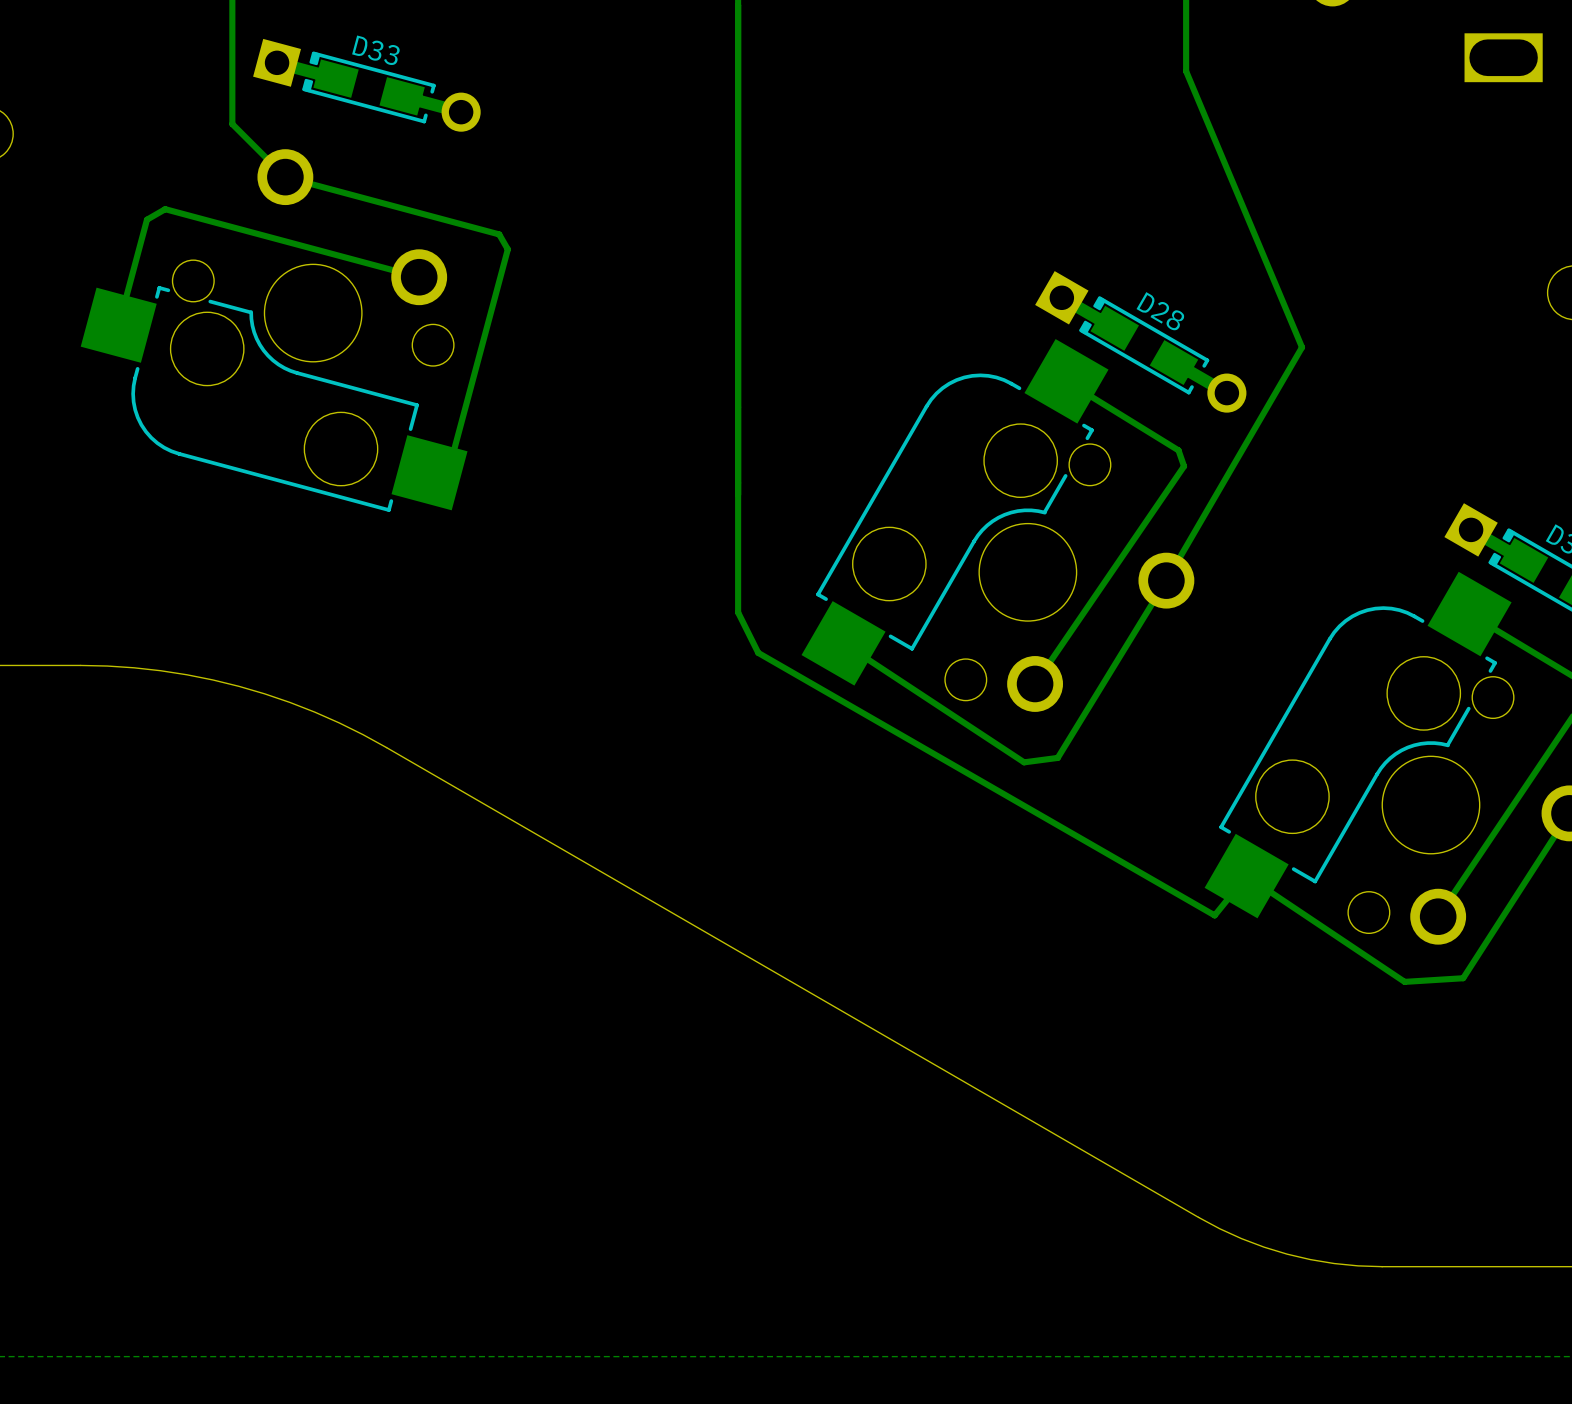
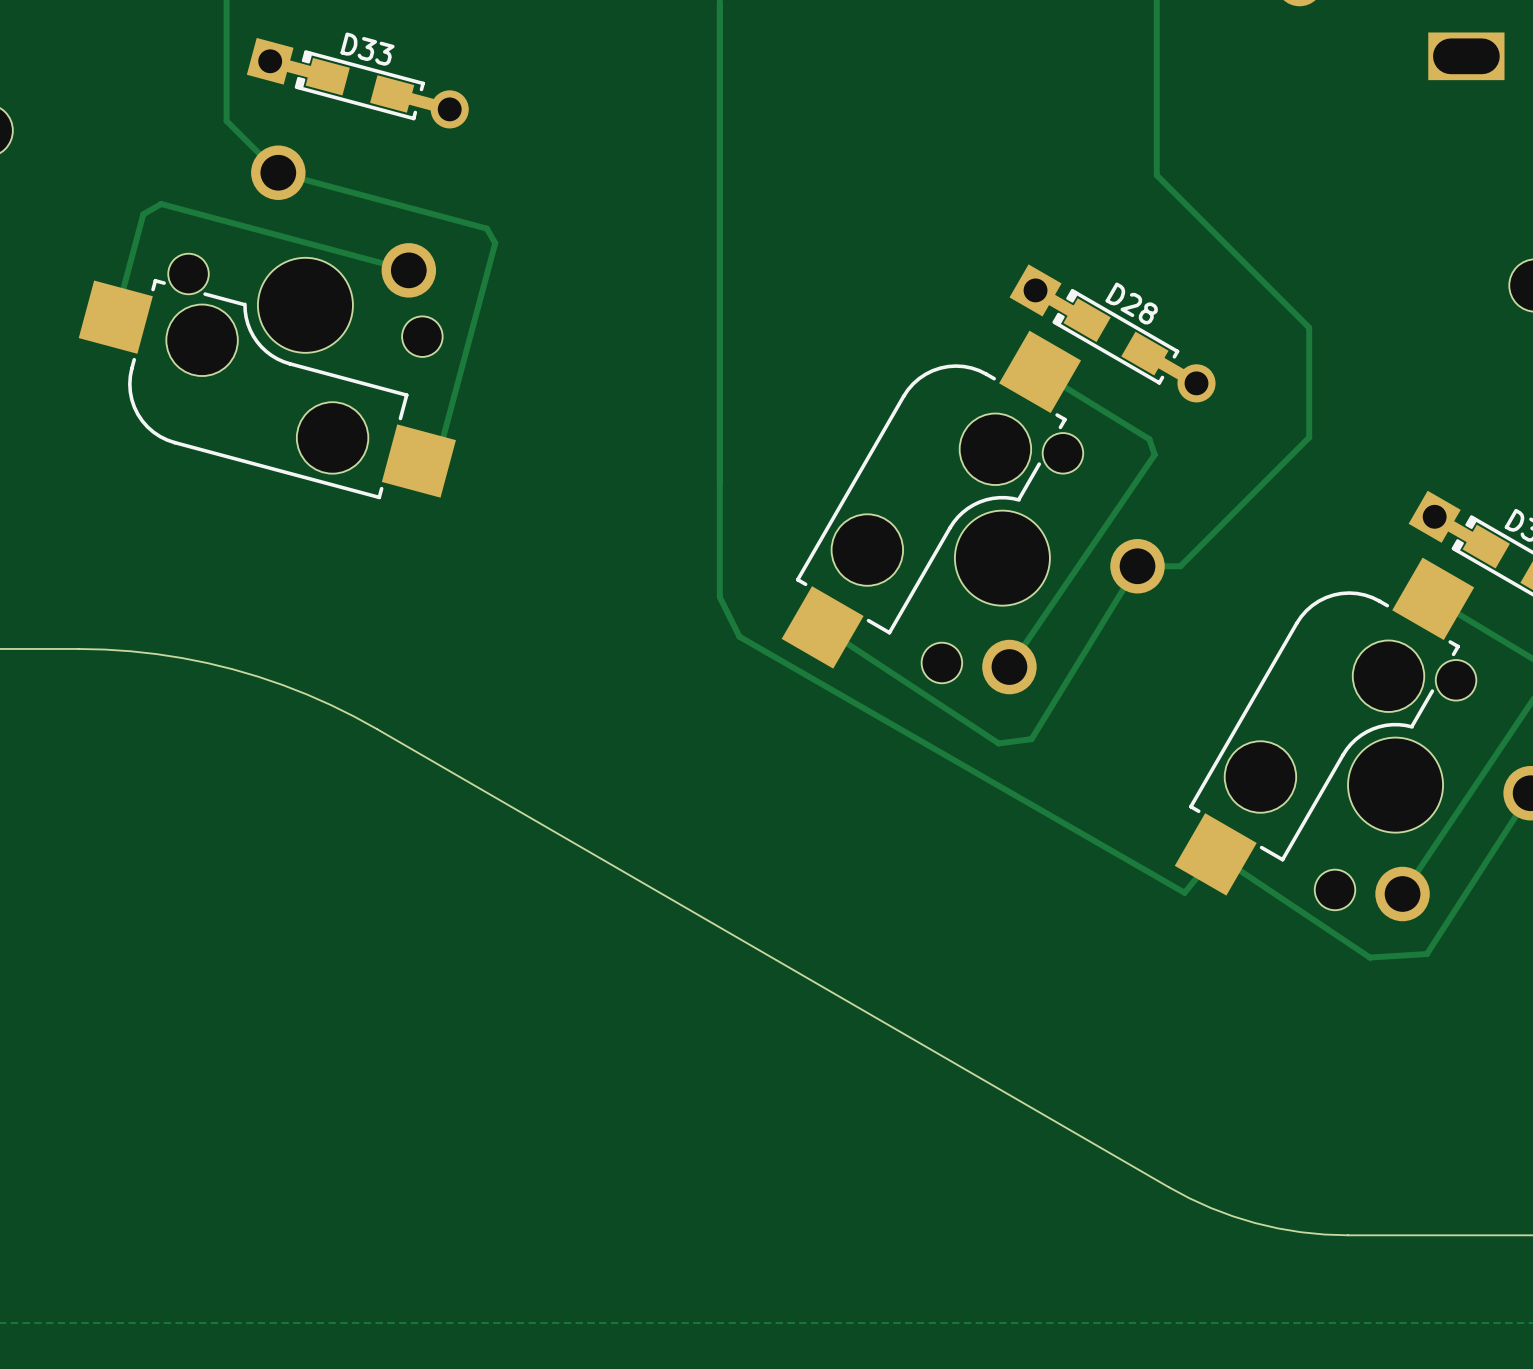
track: (1186, 71) (1302, 347) (1166, 580) -> (1156, 69) (1156, 175) (1309, 327) (1309, 437) (1180, 566) (1137, 566)

